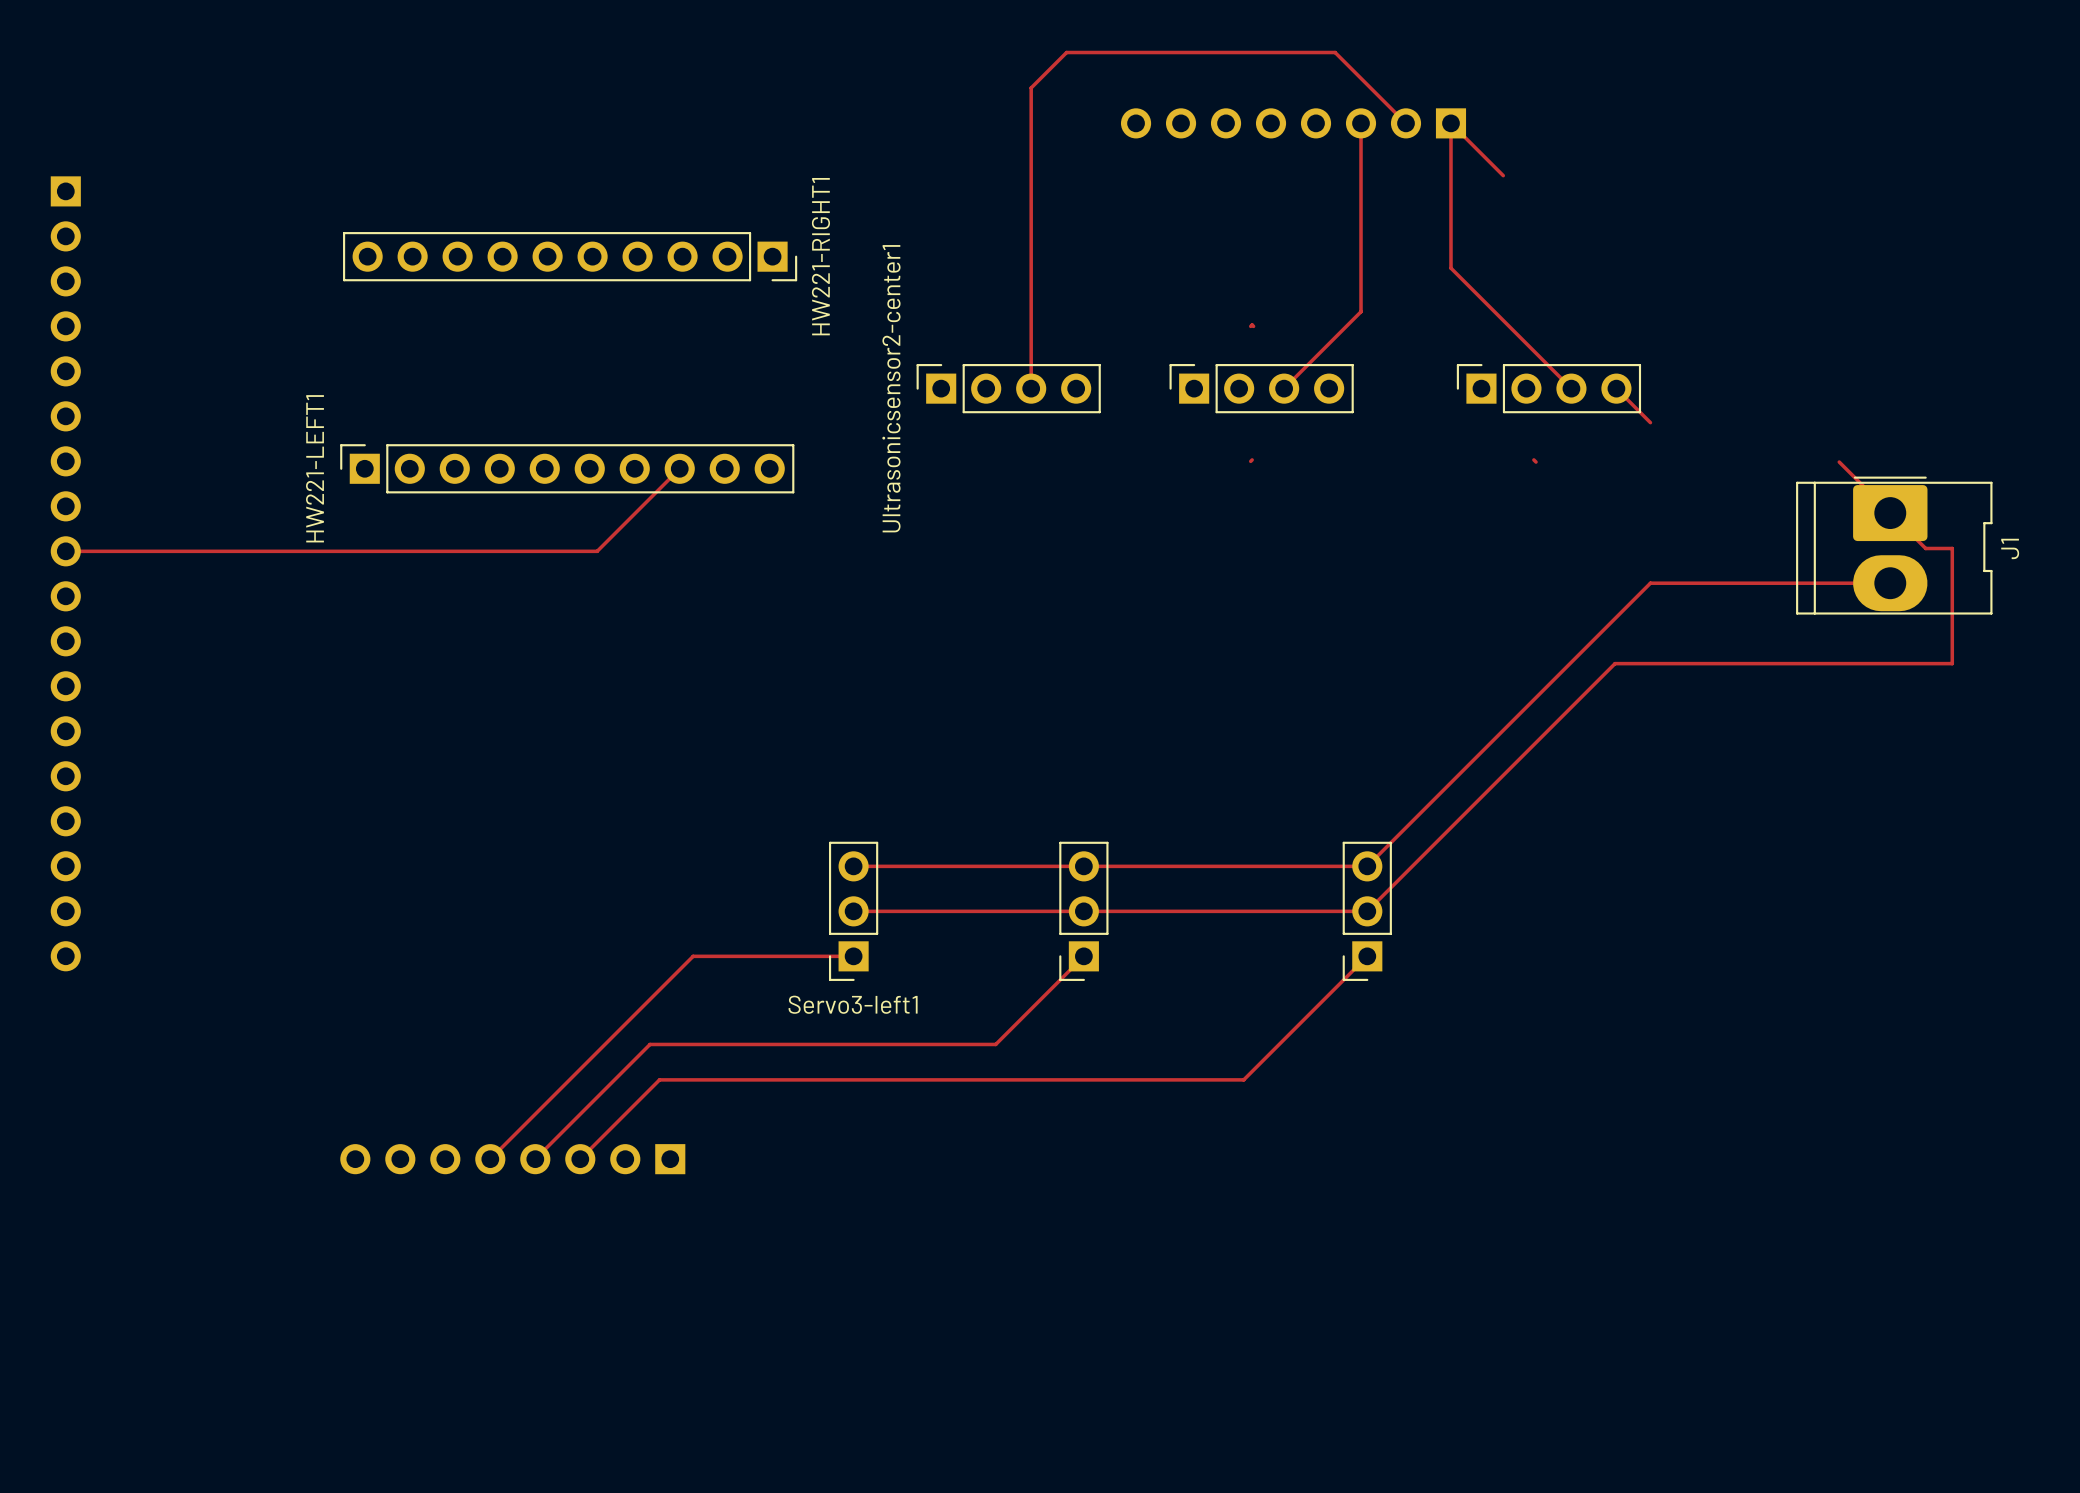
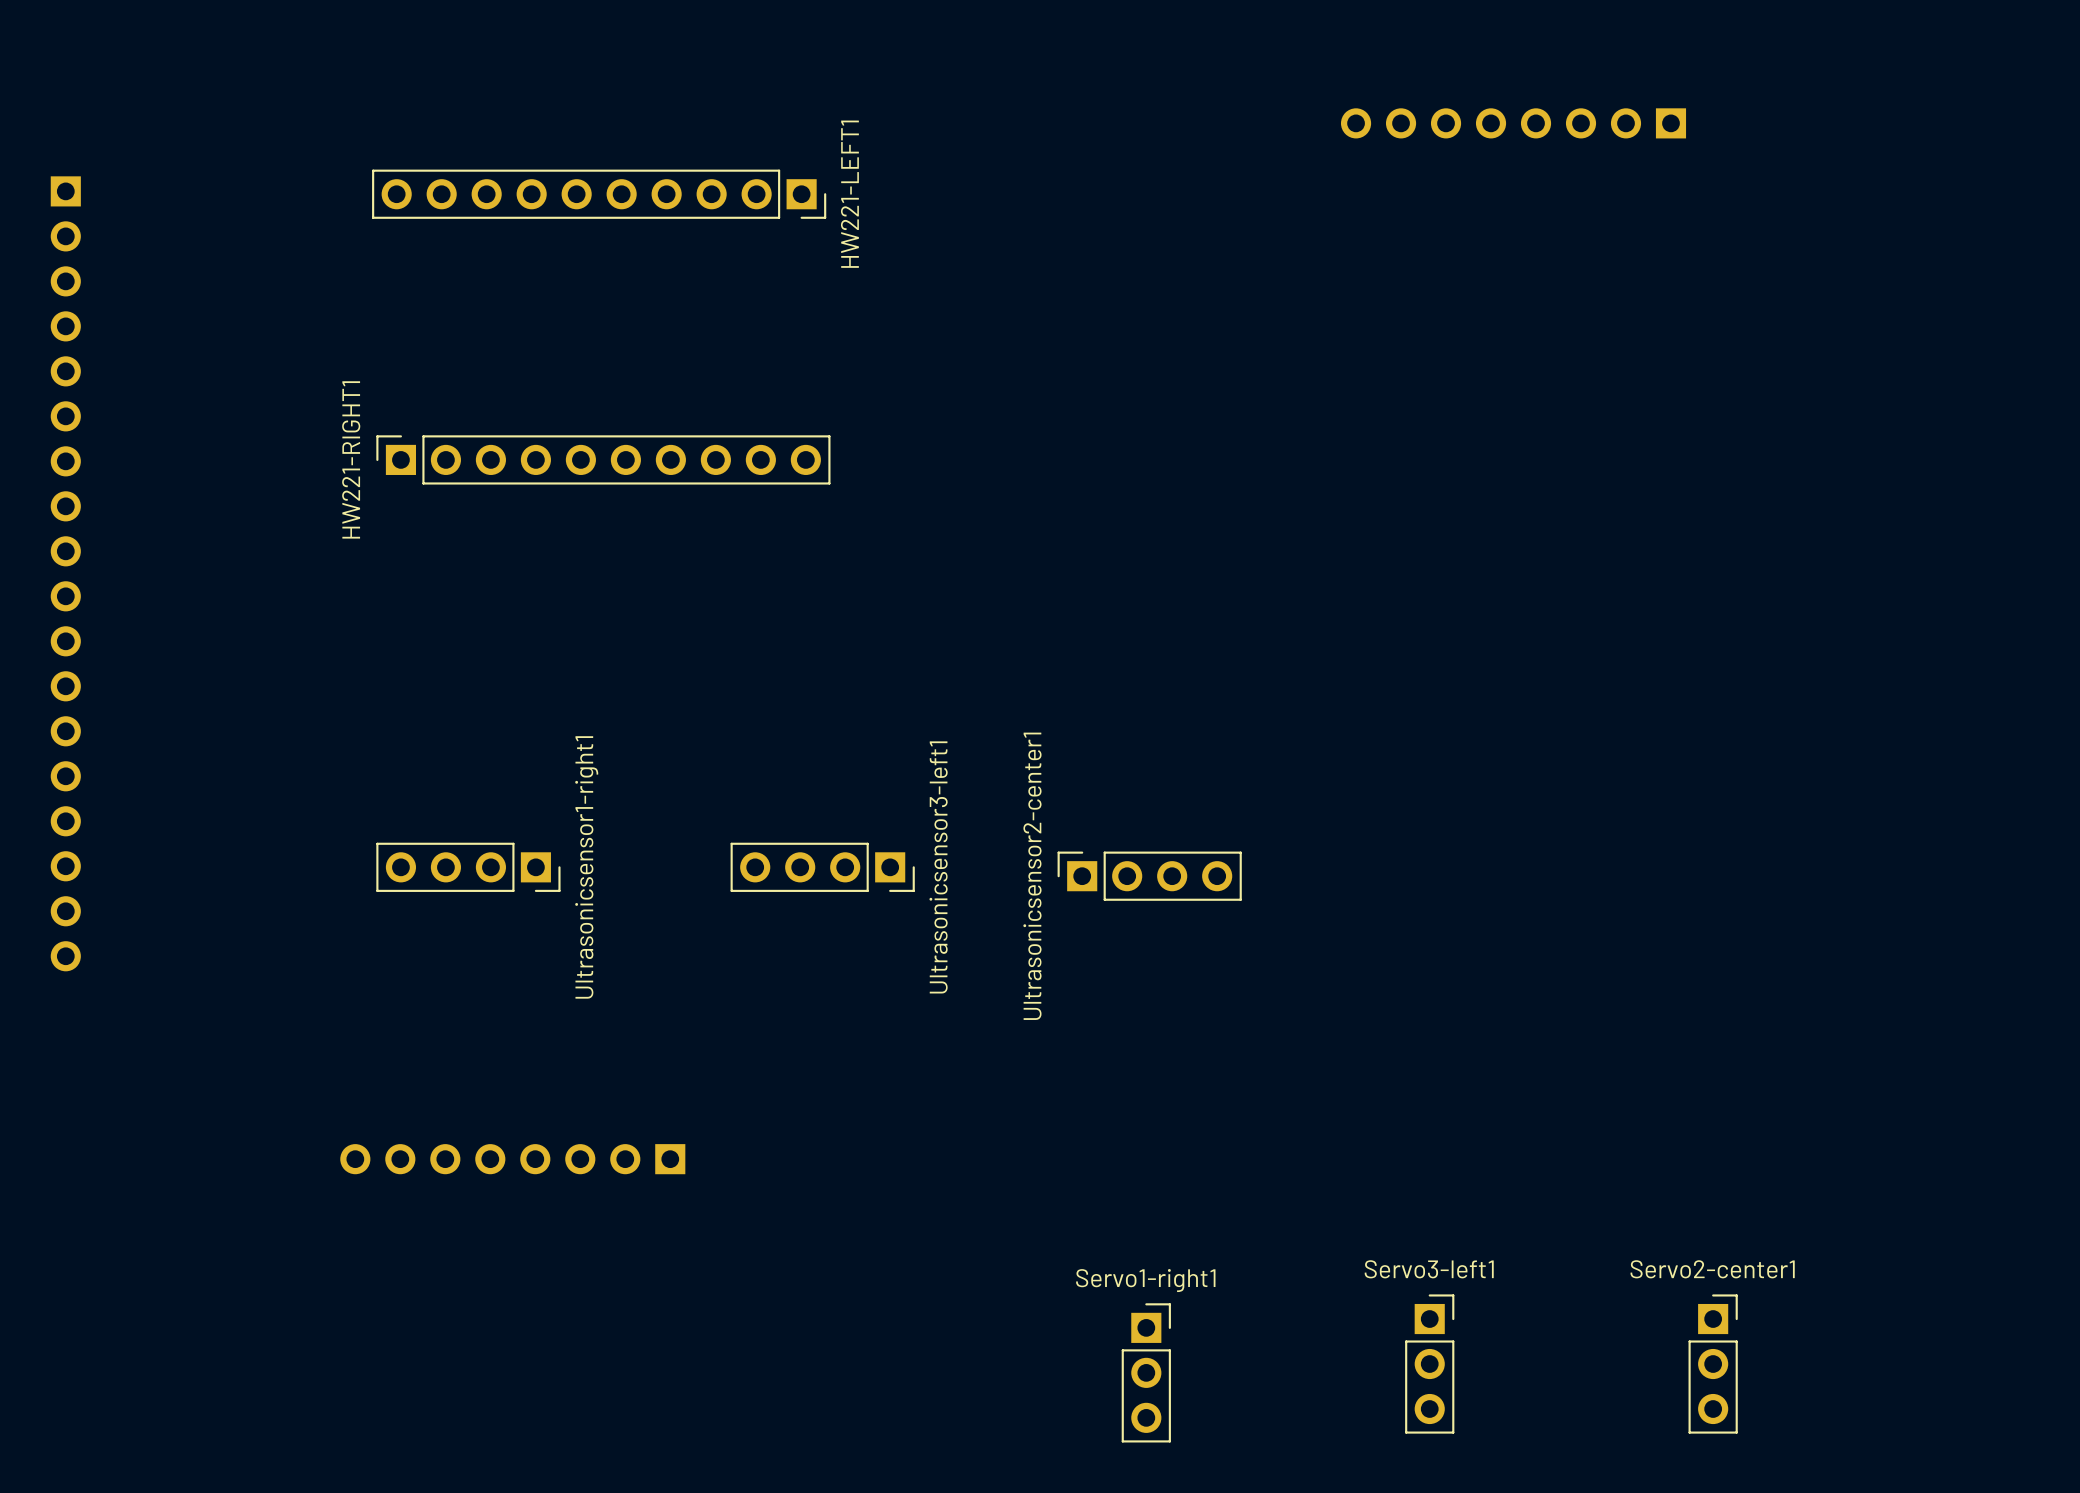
part position: (1293, 123) -> (1513, 123)
track: (1361, 123) (1361, 311) (1284, 388) -> none
track: (1406, 123) (1335, 52) (1066, 52) (1031, 87) (1031, 388) -> none
track: (1503, 175) (1450, 123) (1450, 268) (1571, 388) -> none
HW221-RIGHT1 rotation: 0° (570, 256) -> 180° (603, 459)
track: (1250, 326) (1253, 326) -> none
Ultrasonicsensor2-center1 position: (1008, 388) -> (1149, 876)
part: (1261, 388) -> none
part: (1548, 388) -> none
track: (1616, 388) (1650, 422) -> none
track: (1252, 459) (1250, 461) -> none
track: (1533, 459) (1536, 462) -> none
track: (1839, 462) (1925, 548) (1952, 548) (1952, 663) (1615, 663) (1367, 911) (853, 911) -> none
HW221-LEFT1 rotation: 0° (567, 468) -> 180° (599, 194)
HW221-LEFT1 position: (567, 468) -> (599, 194)
track: (679, 468) (597, 551) (65, 551) -> none
J1: (1894, 545) -> none
track: (1890, 583) (1650, 583) (1367, 866) (853, 866) -> none
Ultrasonicsensor1-right1: none -> (468, 867)
Ultrasonicsensor3-left1: none -> (822, 867)
Servo3-left1 rotation: 0° (853, 911) -> 180° (1429, 1364)
Servo3-left1 position: (853, 911) -> (1429, 1364)
part: (1083, 911) -> none
part: (1367, 911) -> none
track: (853, 956) (693, 956) (490, 1159) -> none
track: (1083, 956) (995, 1044) (649, 1044) (535, 1159) -> none
track: (1367, 956) (1243, 1079) (659, 1079) (580, 1159) -> none
Servo2-center1: none -> (1713, 1364)
Servo1-right1: none -> (1146, 1372)

